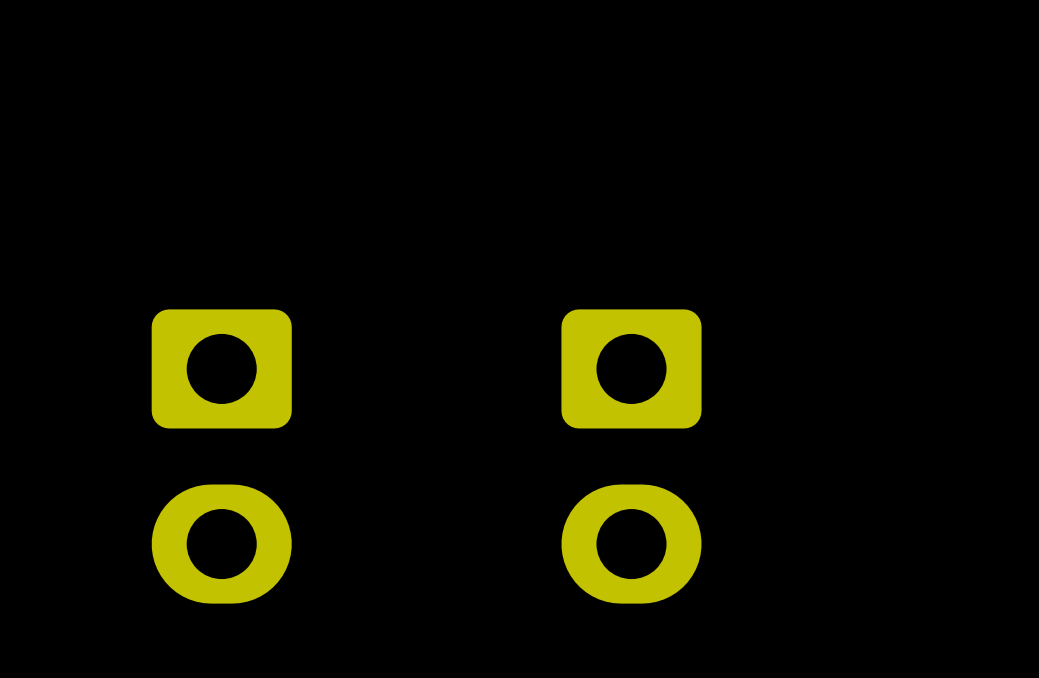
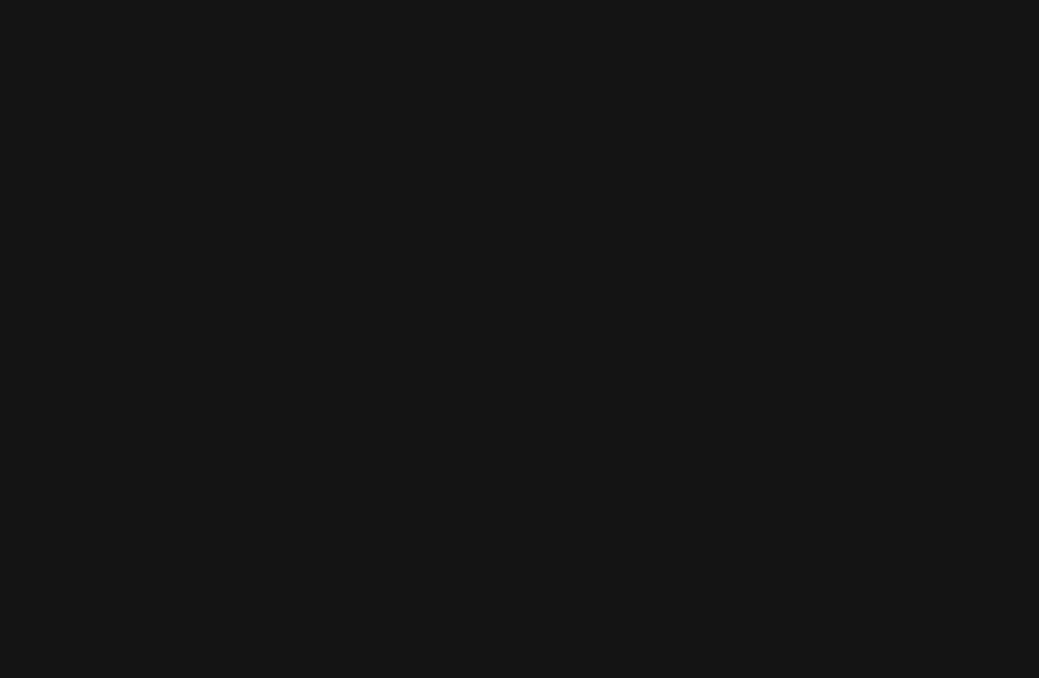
part: (221, 456) -> none
part: (631, 456) -> none

